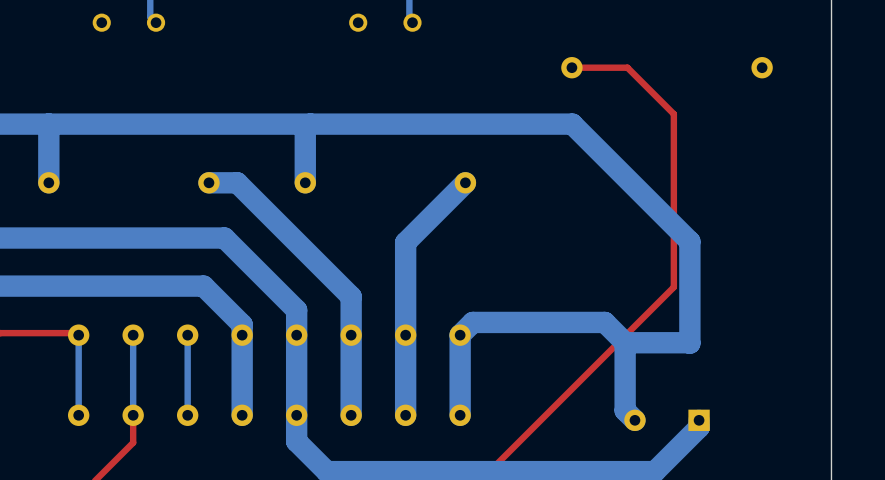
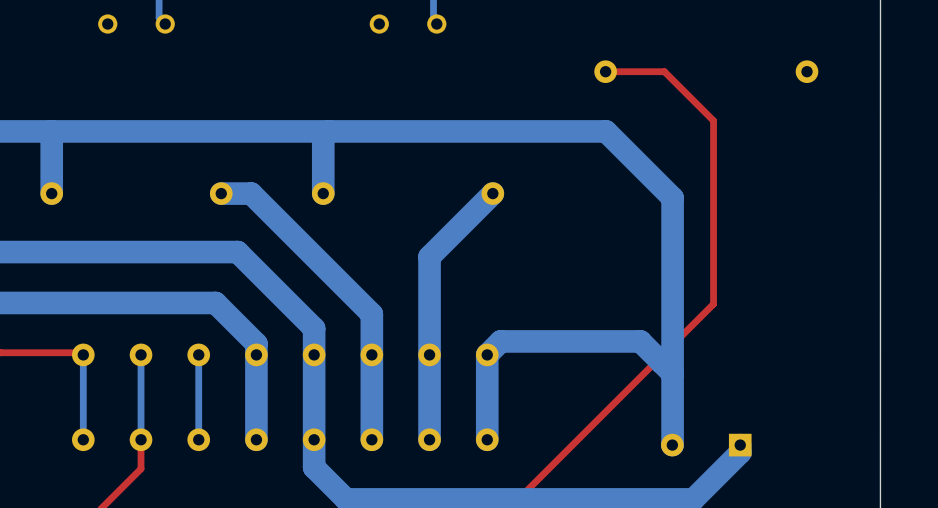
bottom track: (635, 186) (689, 241) (689, 343) (625, 342) (625, 410) (634, 420) -> (672, 197) (672, 445)

